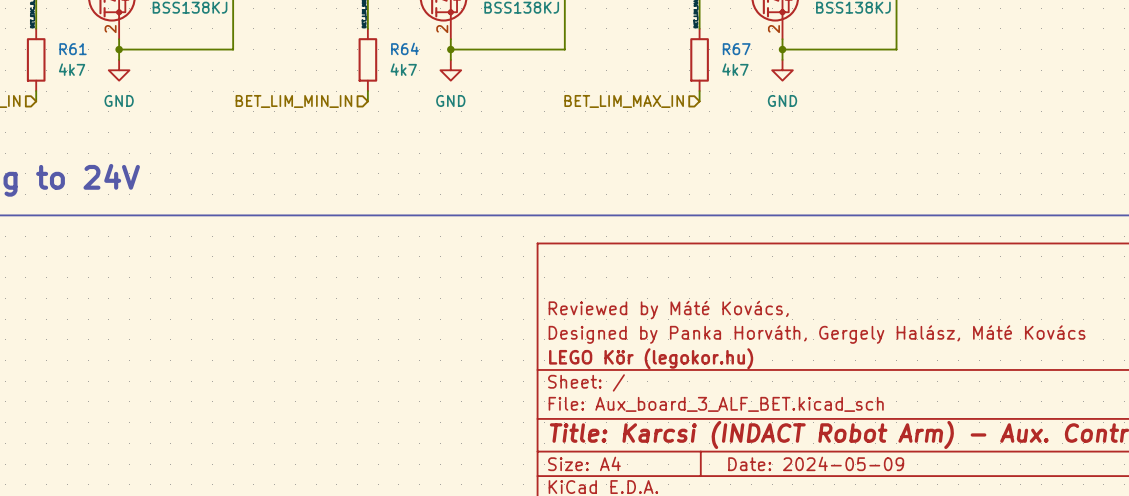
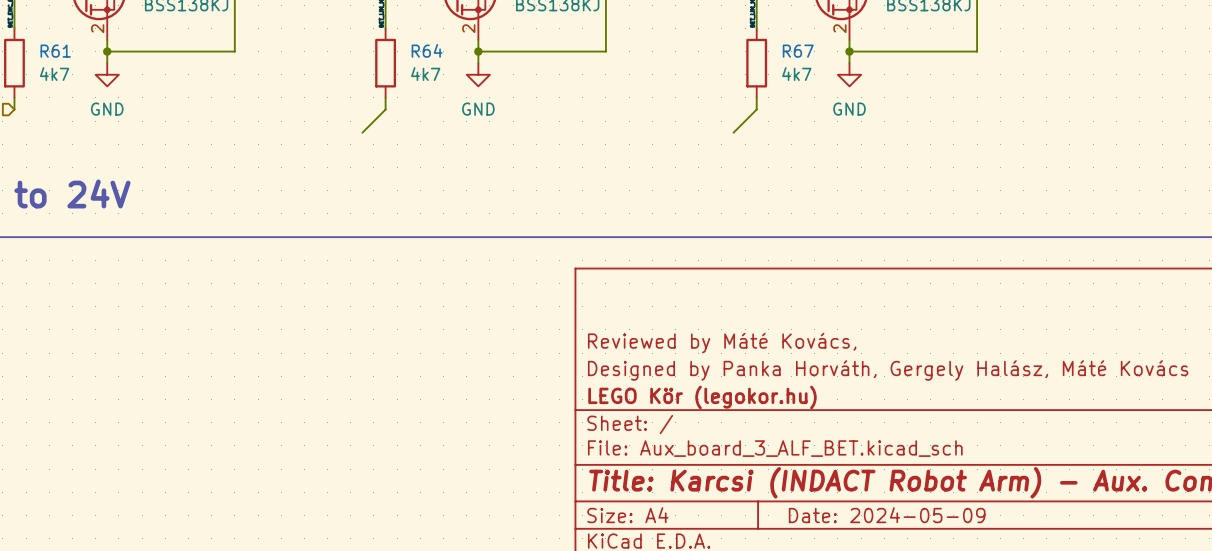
hierarchical label: BET_LIM_MIN_IN (293, 101) -> none
wire: none -> (385, 109) (362, 132)
hierarchical label: BET_LIM_MAX_IN (624, 101) -> none
wire: none -> (756, 109) (733, 132)

